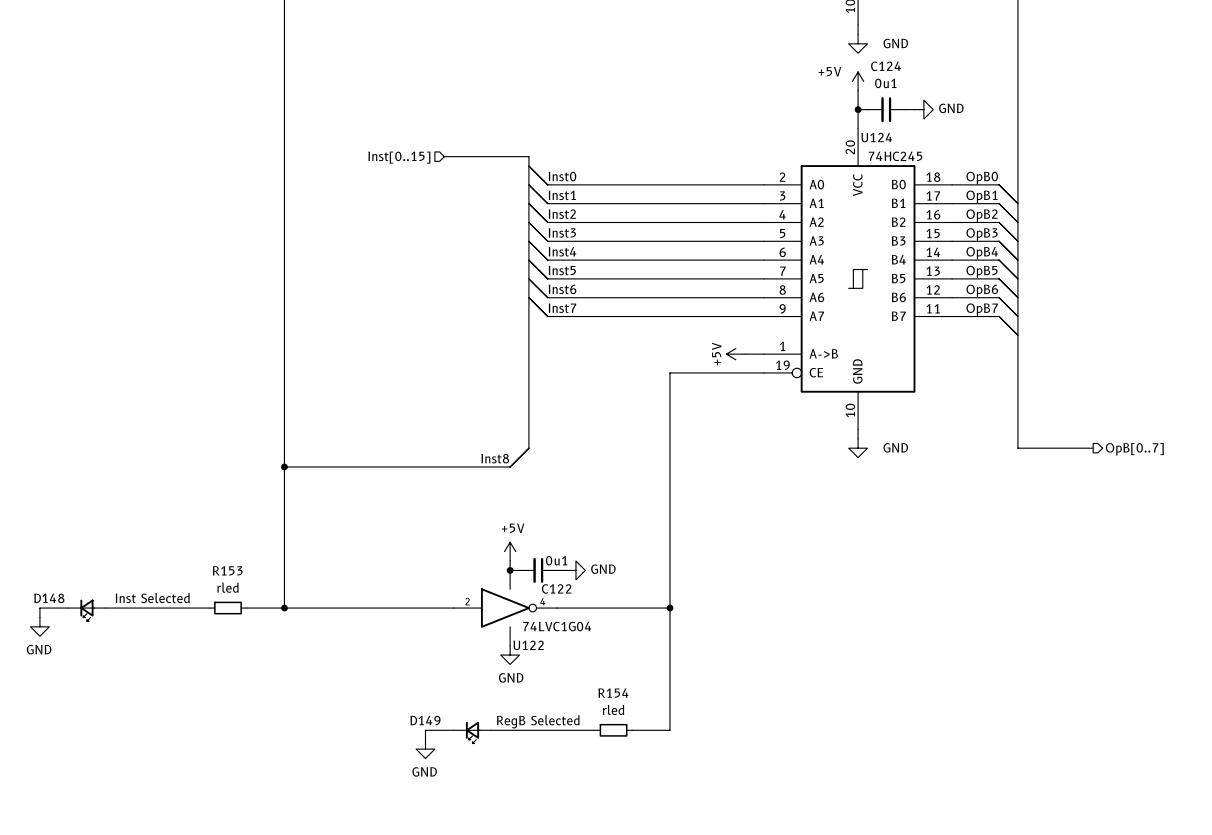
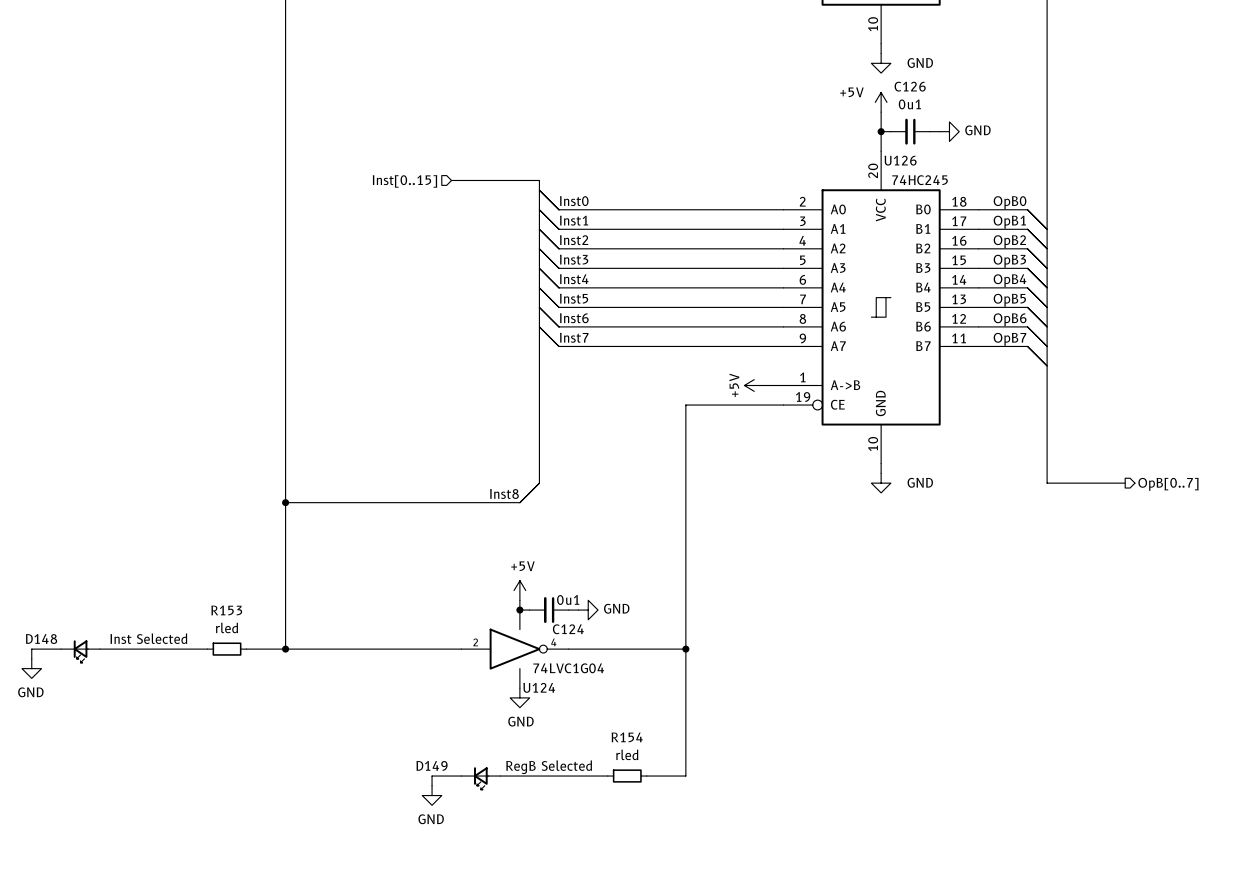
C124 name: C124 (885, 66) -> C126 (910, 86)
U124 name: U124 (876, 137) -> U126 (900, 160)
C122 name: C122 (556, 588) -> C124 (568, 629)
U122 name: U122 (528, 645) -> U124 (539, 687)

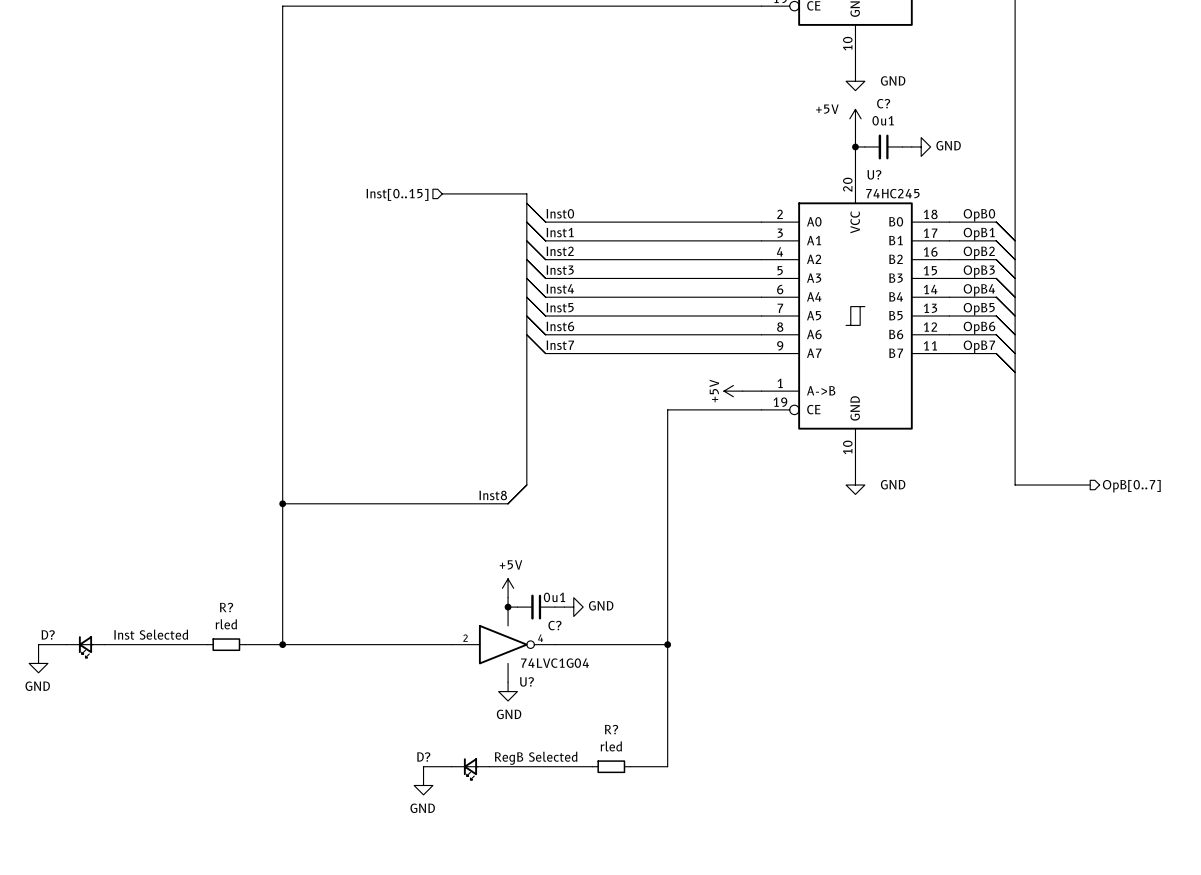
C126 name: C126 (910, 86) -> C? (883, 103)
U126 name: U126 (900, 160) -> U? (874, 174)
R153 name: R153 (226, 610) -> R? (226, 607)
C124 name: C124 (568, 629) -> C? (554, 625)
D148 name: D148 (41, 639) -> D? (48, 634)
U124 name: U124 (539, 687) -> U? (526, 681)
R154 name: R154 (627, 737) -> R? (611, 729)
D149 name: D149 (432, 765) -> D? (423, 757)

